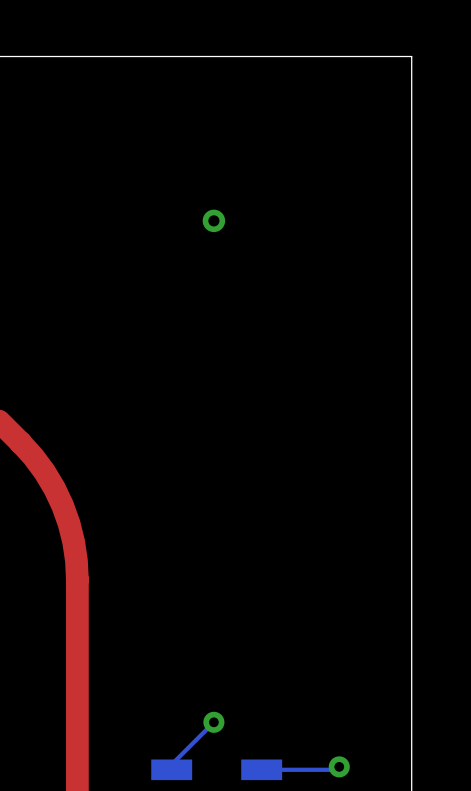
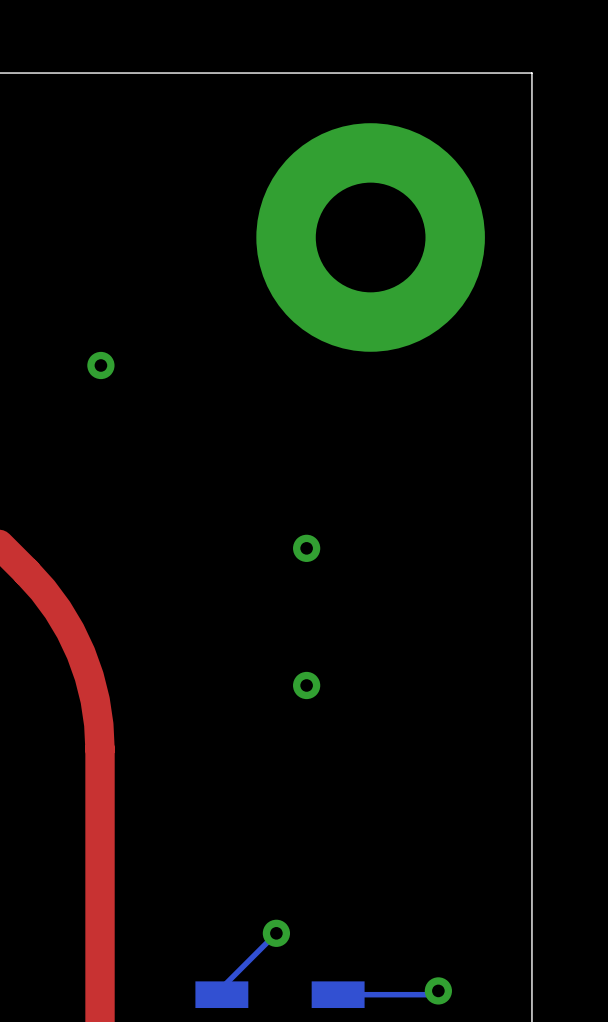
part: none -> (370, 237)
via: (213, 220) -> none
via: none -> (100, 365)
via: none -> (306, 548)
via: none -> (306, 685)

